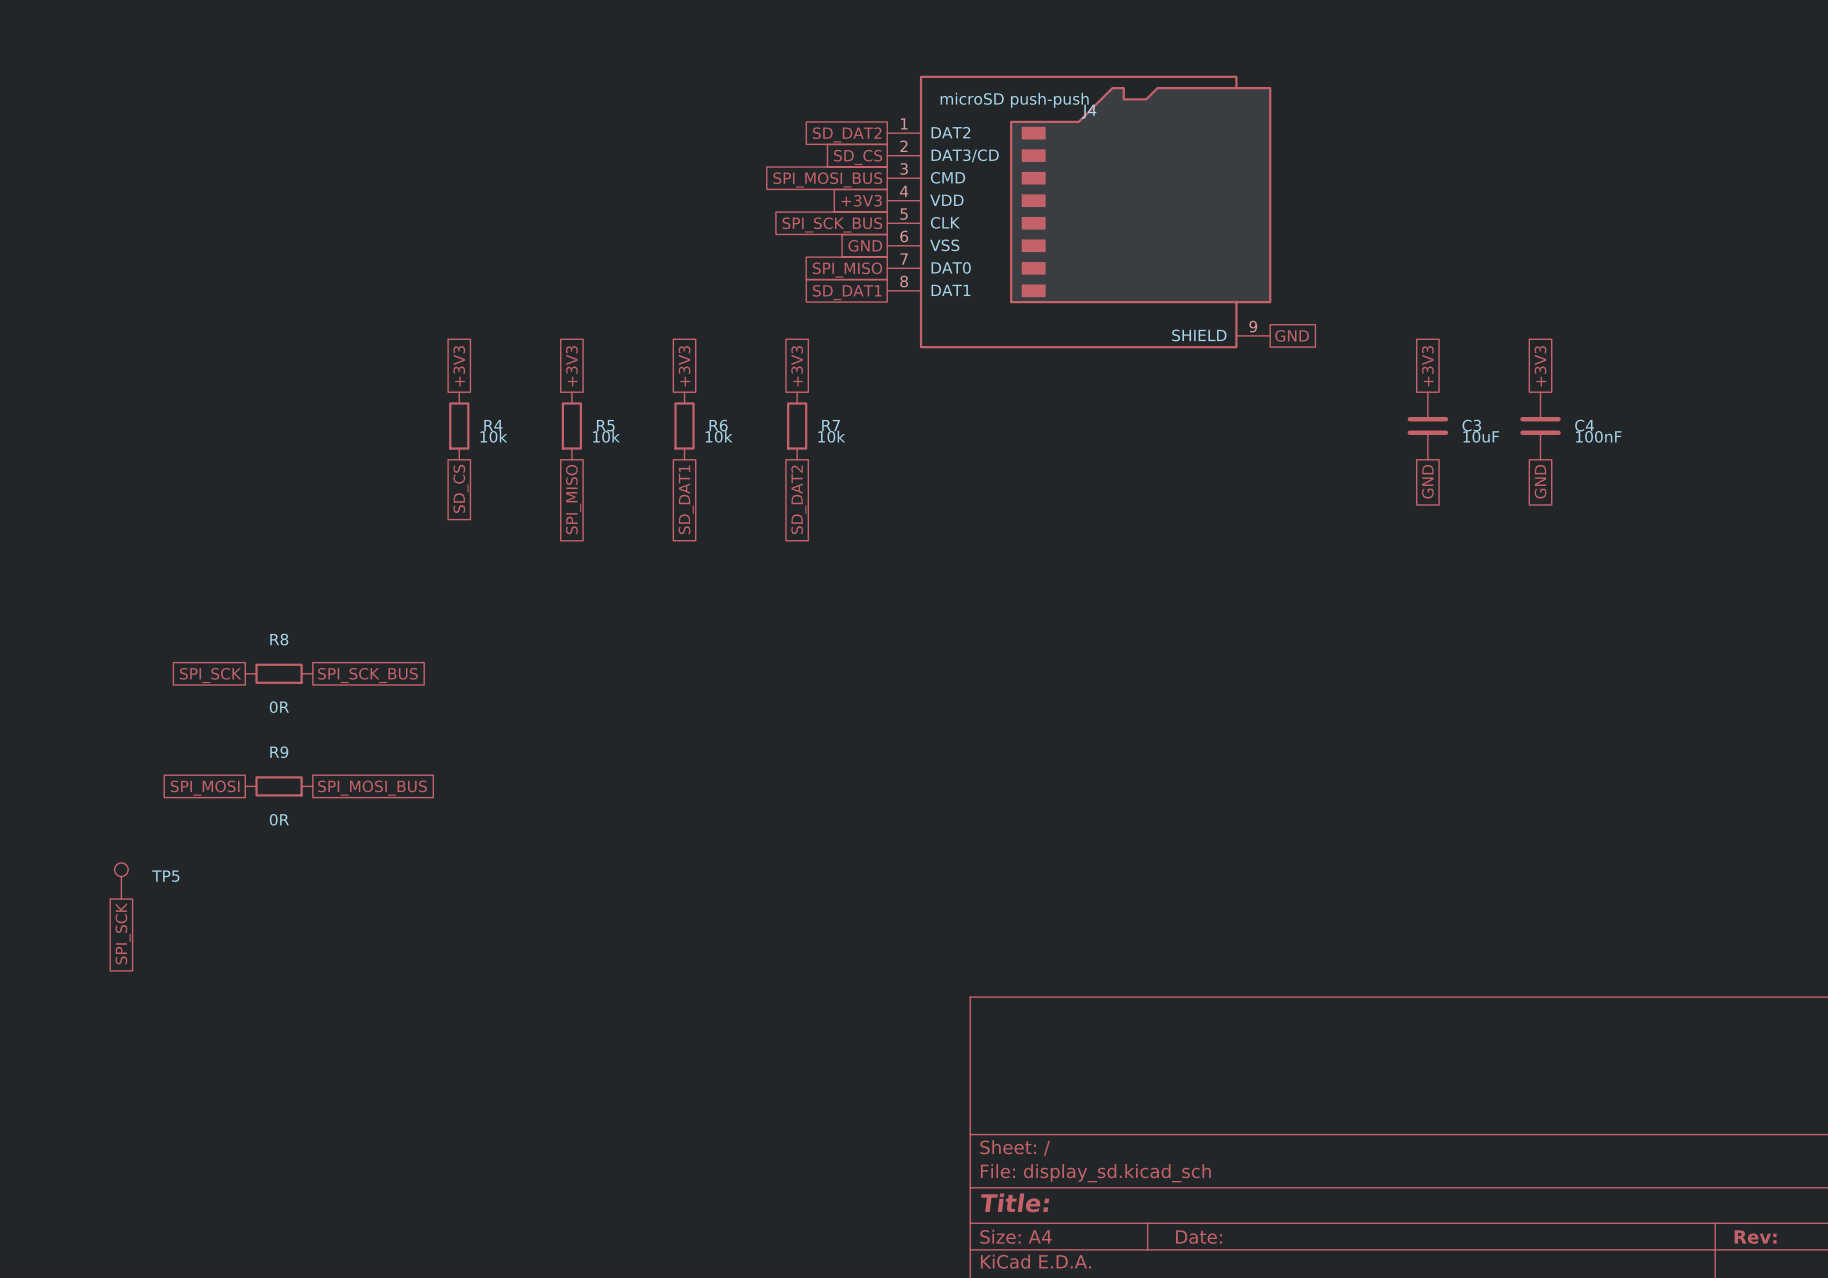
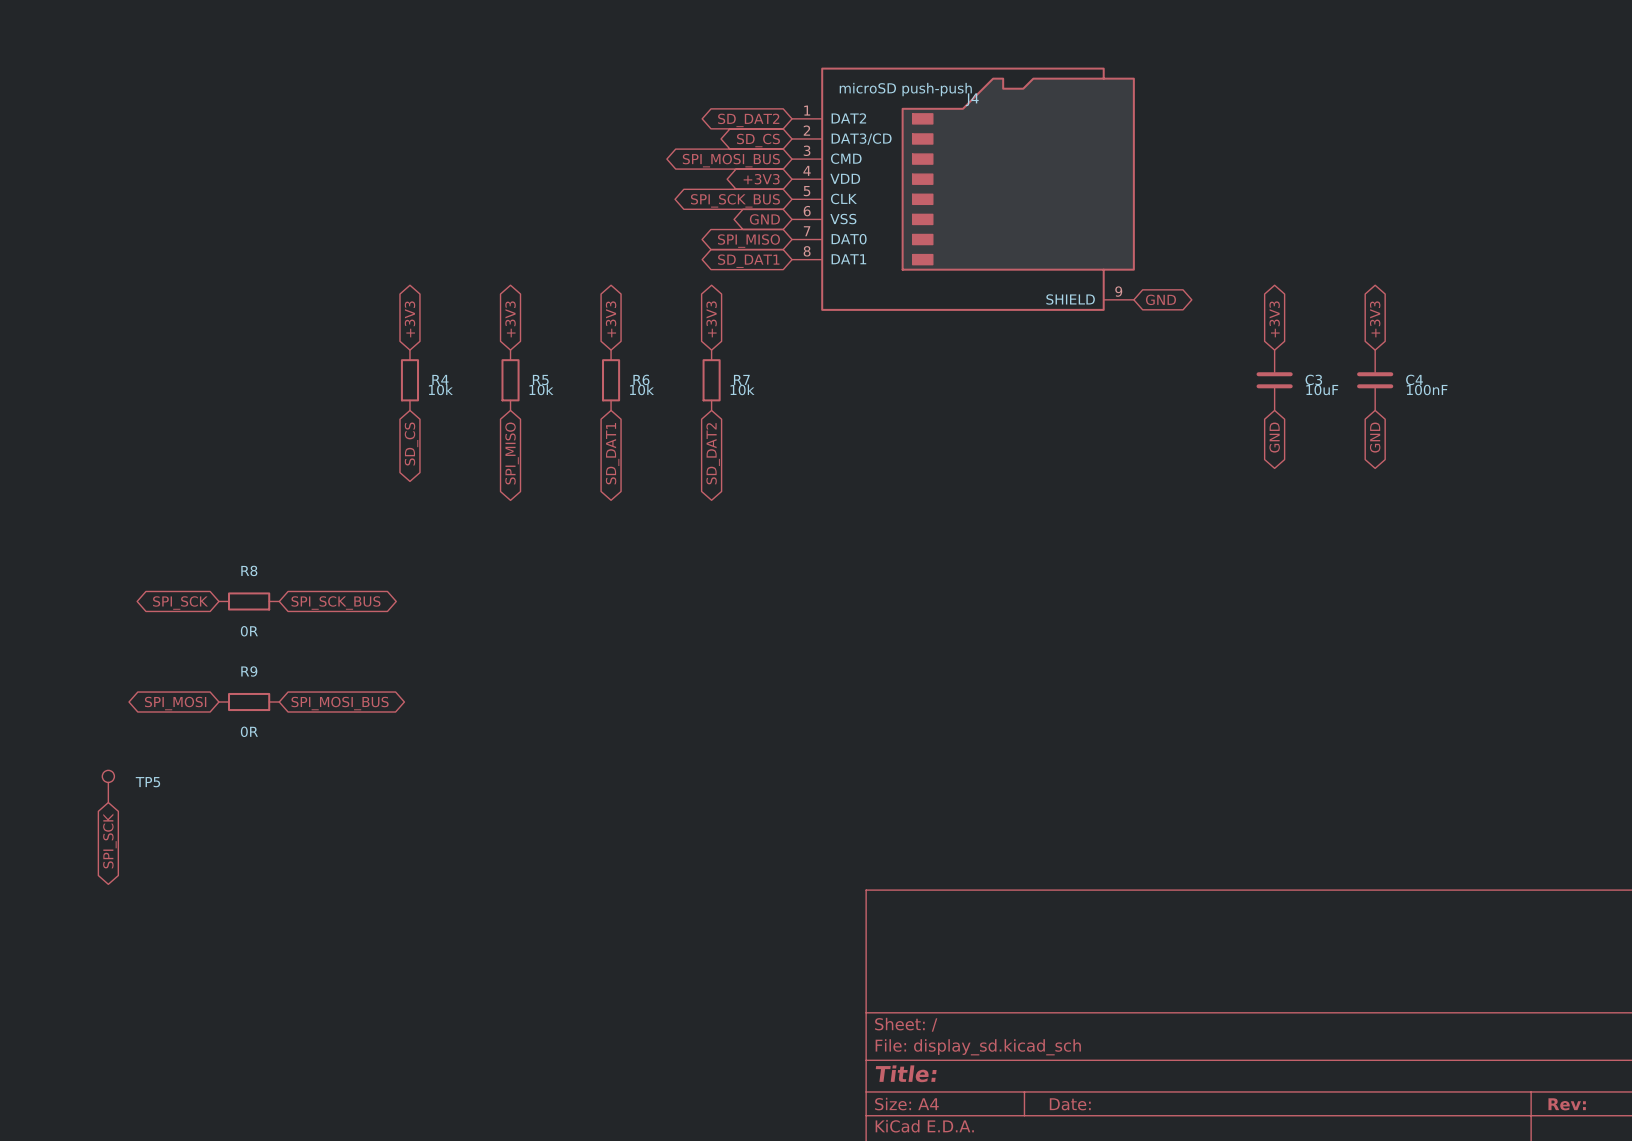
global label shape: passive (847, 134) -> bidirectional (748, 120)
global label shape: passive (858, 157) -> bidirectional (758, 140)
global label shape: passive (827, 179) -> bidirectional (731, 160)
global label shape: passive (861, 200) -> bidirectional (761, 179)
global label shape: passive (832, 224) -> bidirectional (735, 200)
global label shape: passive (865, 245) -> bidirectional (764, 219)
global label shape: passive (847, 270) -> bidirectional (748, 241)
global label shape: passive (847, 292) -> bidirectional (748, 261)
global label shape: passive (1292, 335) -> bidirectional (1160, 299)
global label shape: passive (459, 366) -> bidirectional (409, 319)
global label shape: passive (571, 366) -> bidirectional (510, 319)
global label shape: passive (684, 366) -> bidirectional (611, 319)
global label shape: passive (797, 366) -> bidirectional (711, 319)
global label shape: passive (1427, 366) -> bidirectional (1274, 319)
global label shape: passive (1540, 366) -> bidirectional (1375, 319)
global label shape: passive (1427, 481) -> bidirectional (1274, 437)
global label shape: passive (1540, 481) -> bidirectional (1375, 437)
global label shape: passive (460, 488) -> bidirectional (411, 444)
global label shape: passive (573, 499) -> bidirectional (512, 453)
global label shape: passive (686, 499) -> bidirectional (612, 453)
global label shape: passive (798, 499) -> bidirectional (713, 453)
global label shape: passive (210, 675) -> bidirectional (180, 603)
global label shape: passive (367, 675) -> bidirectional (335, 603)
global label shape: passive (205, 788) -> bidirectional (175, 703)
global label shape: passive (372, 788) -> bidirectional (340, 703)
global label shape: passive (123, 933) -> bidirectional (109, 840)

